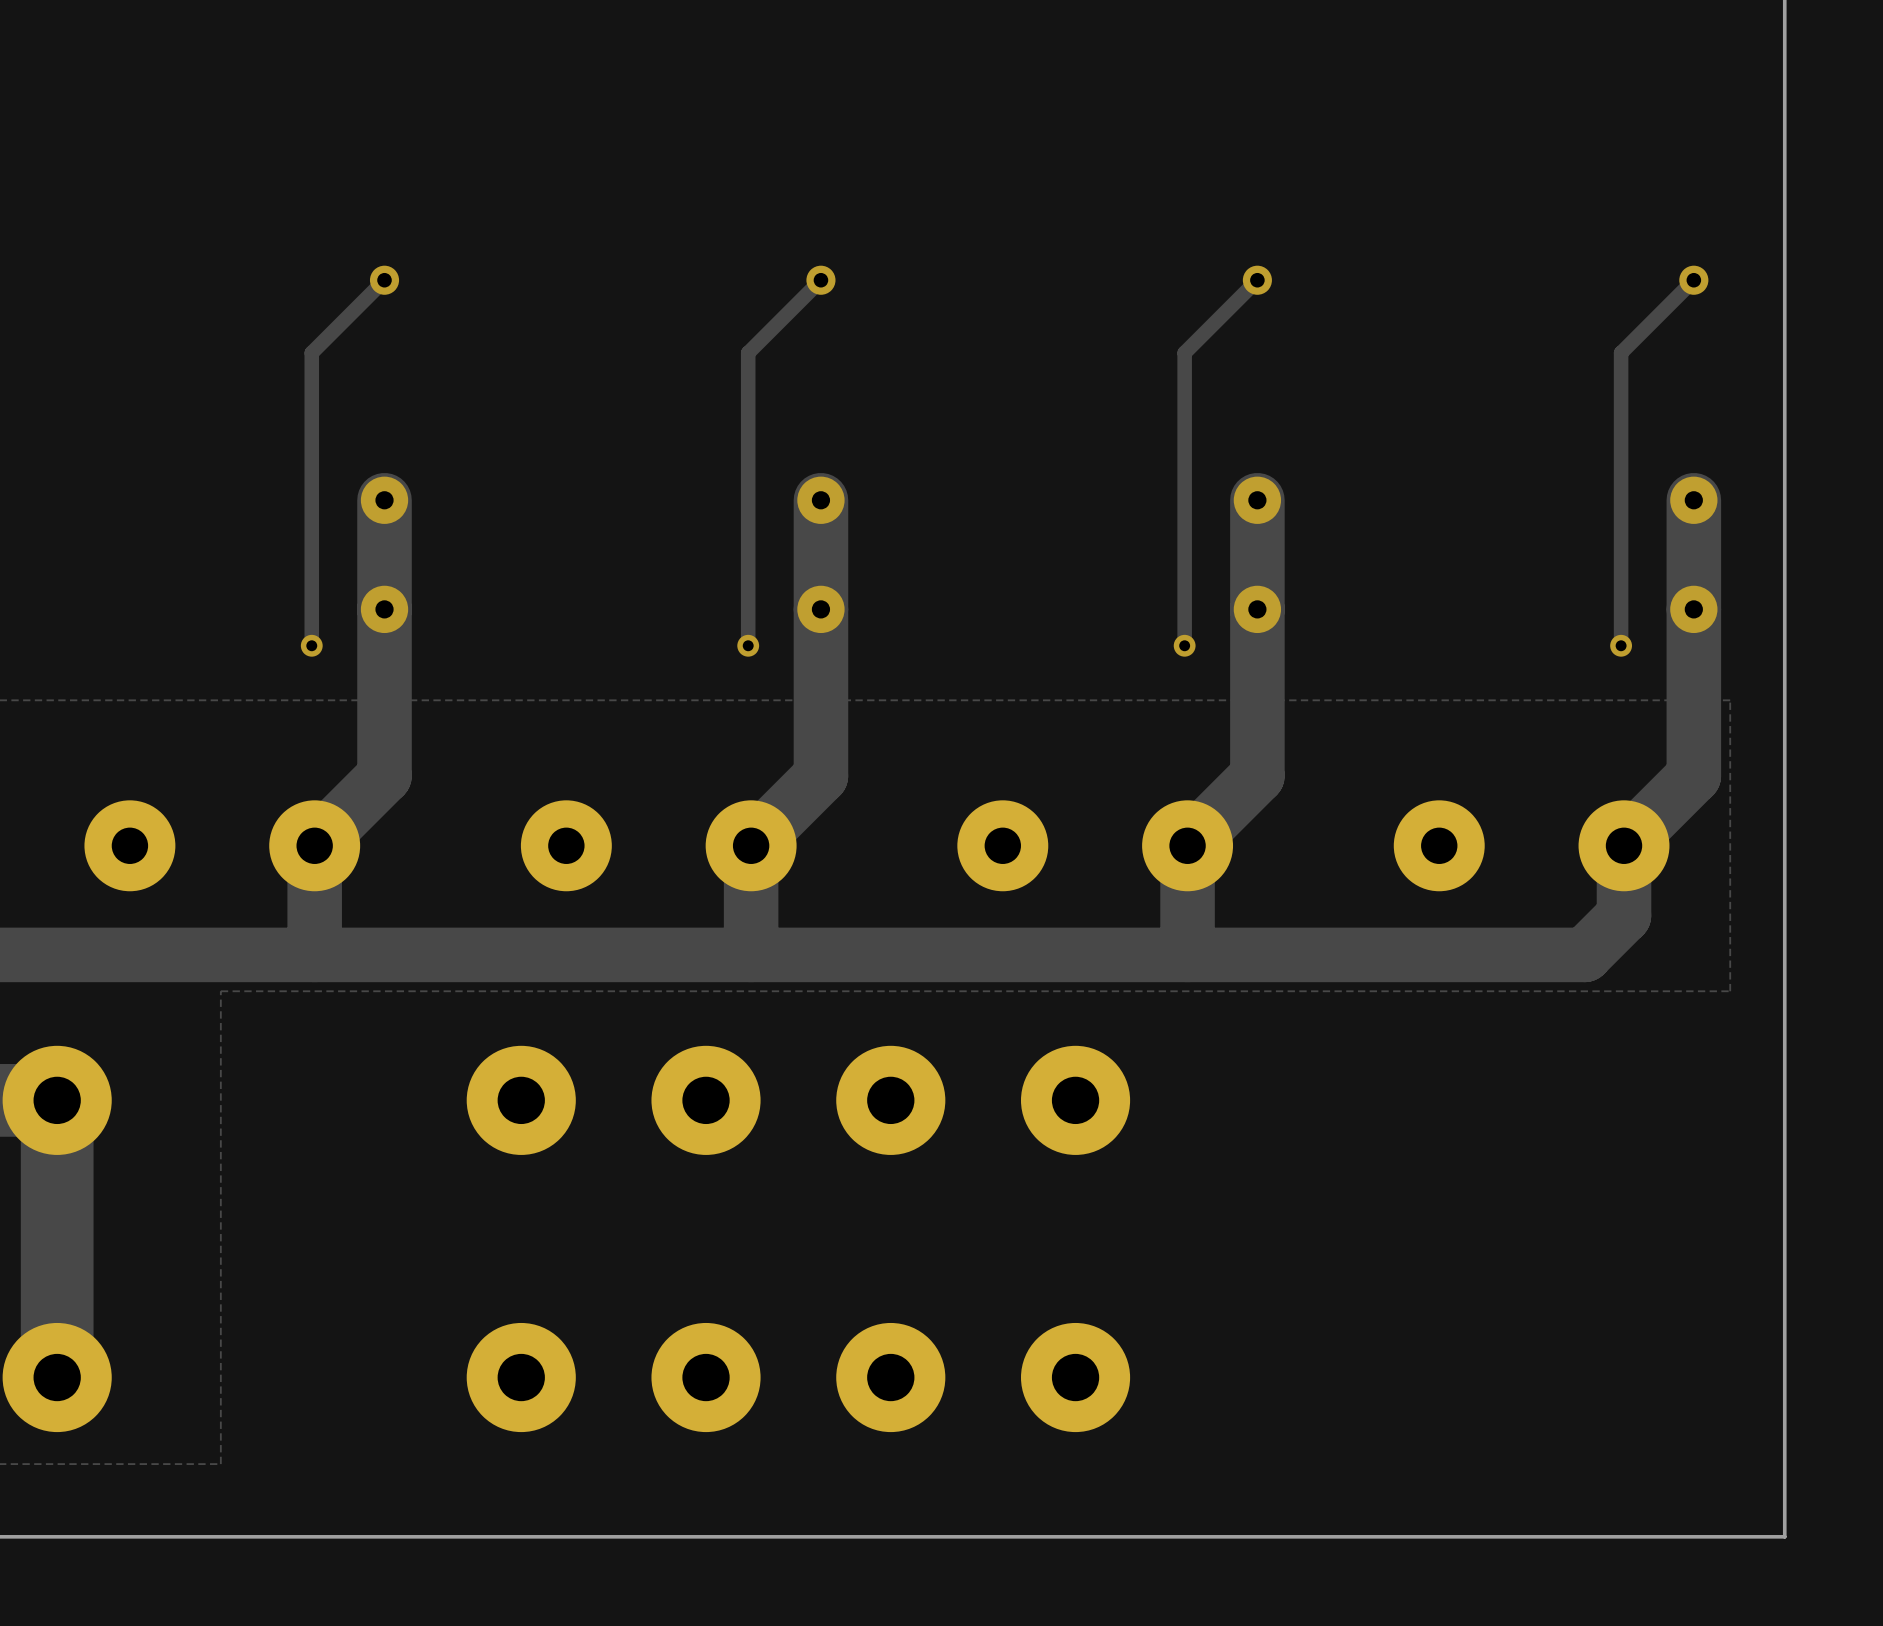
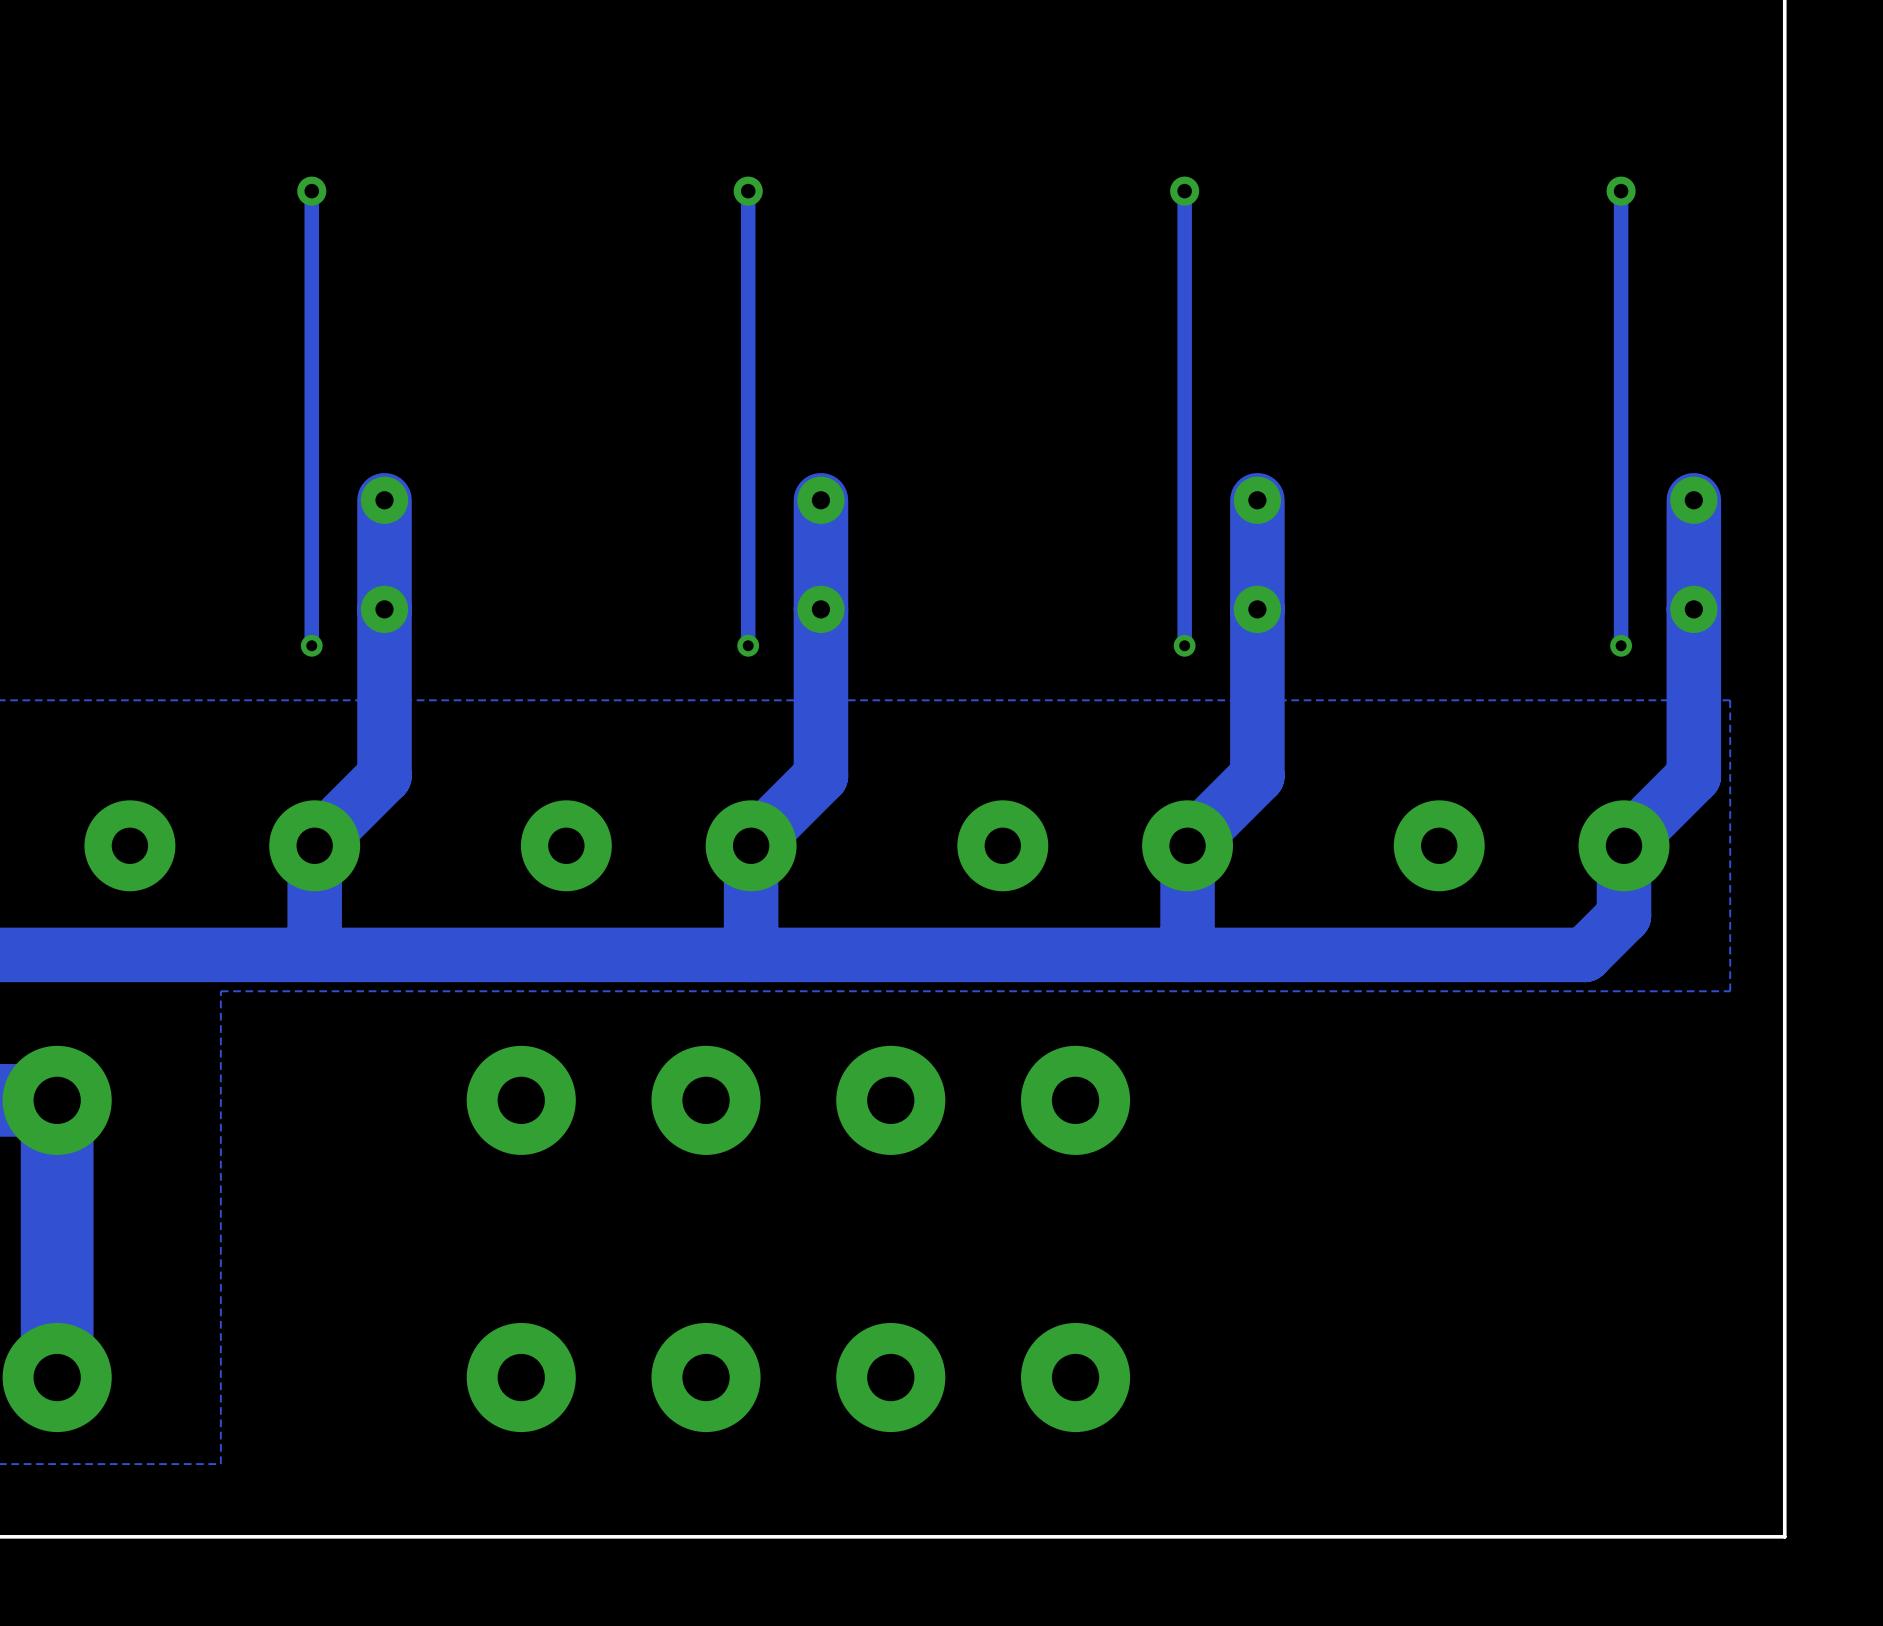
track: (384, 280) (311, 352) -> (311, 191) (311, 352)
via position: (384, 280) -> (311, 191)
track: (820, 280) (748, 352) -> (748, 191) (748, 352)
via position: (820, 280) -> (748, 191)
track: (1257, 280) (1184, 352) -> (1184, 191) (1184, 352)
via position: (1257, 280) -> (1184, 191)
track: (1693, 280) (1621, 352) -> (1621, 191) (1621, 352)
via position: (1693, 280) -> (1621, 191)

